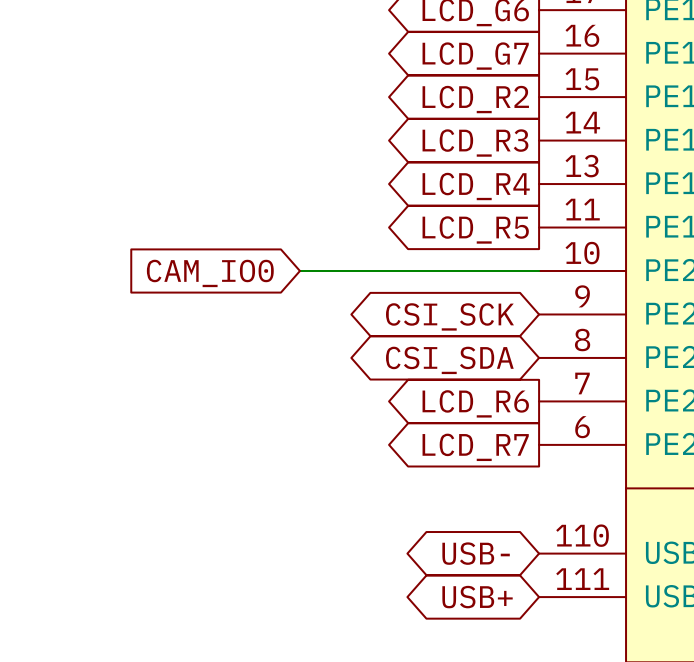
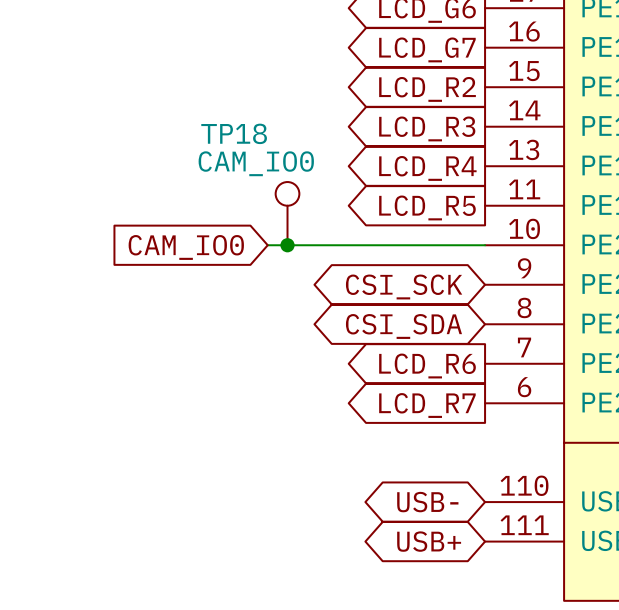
TP18: none -> CAM_IO0 (287, 213)
junction: none -> (287, 245)

